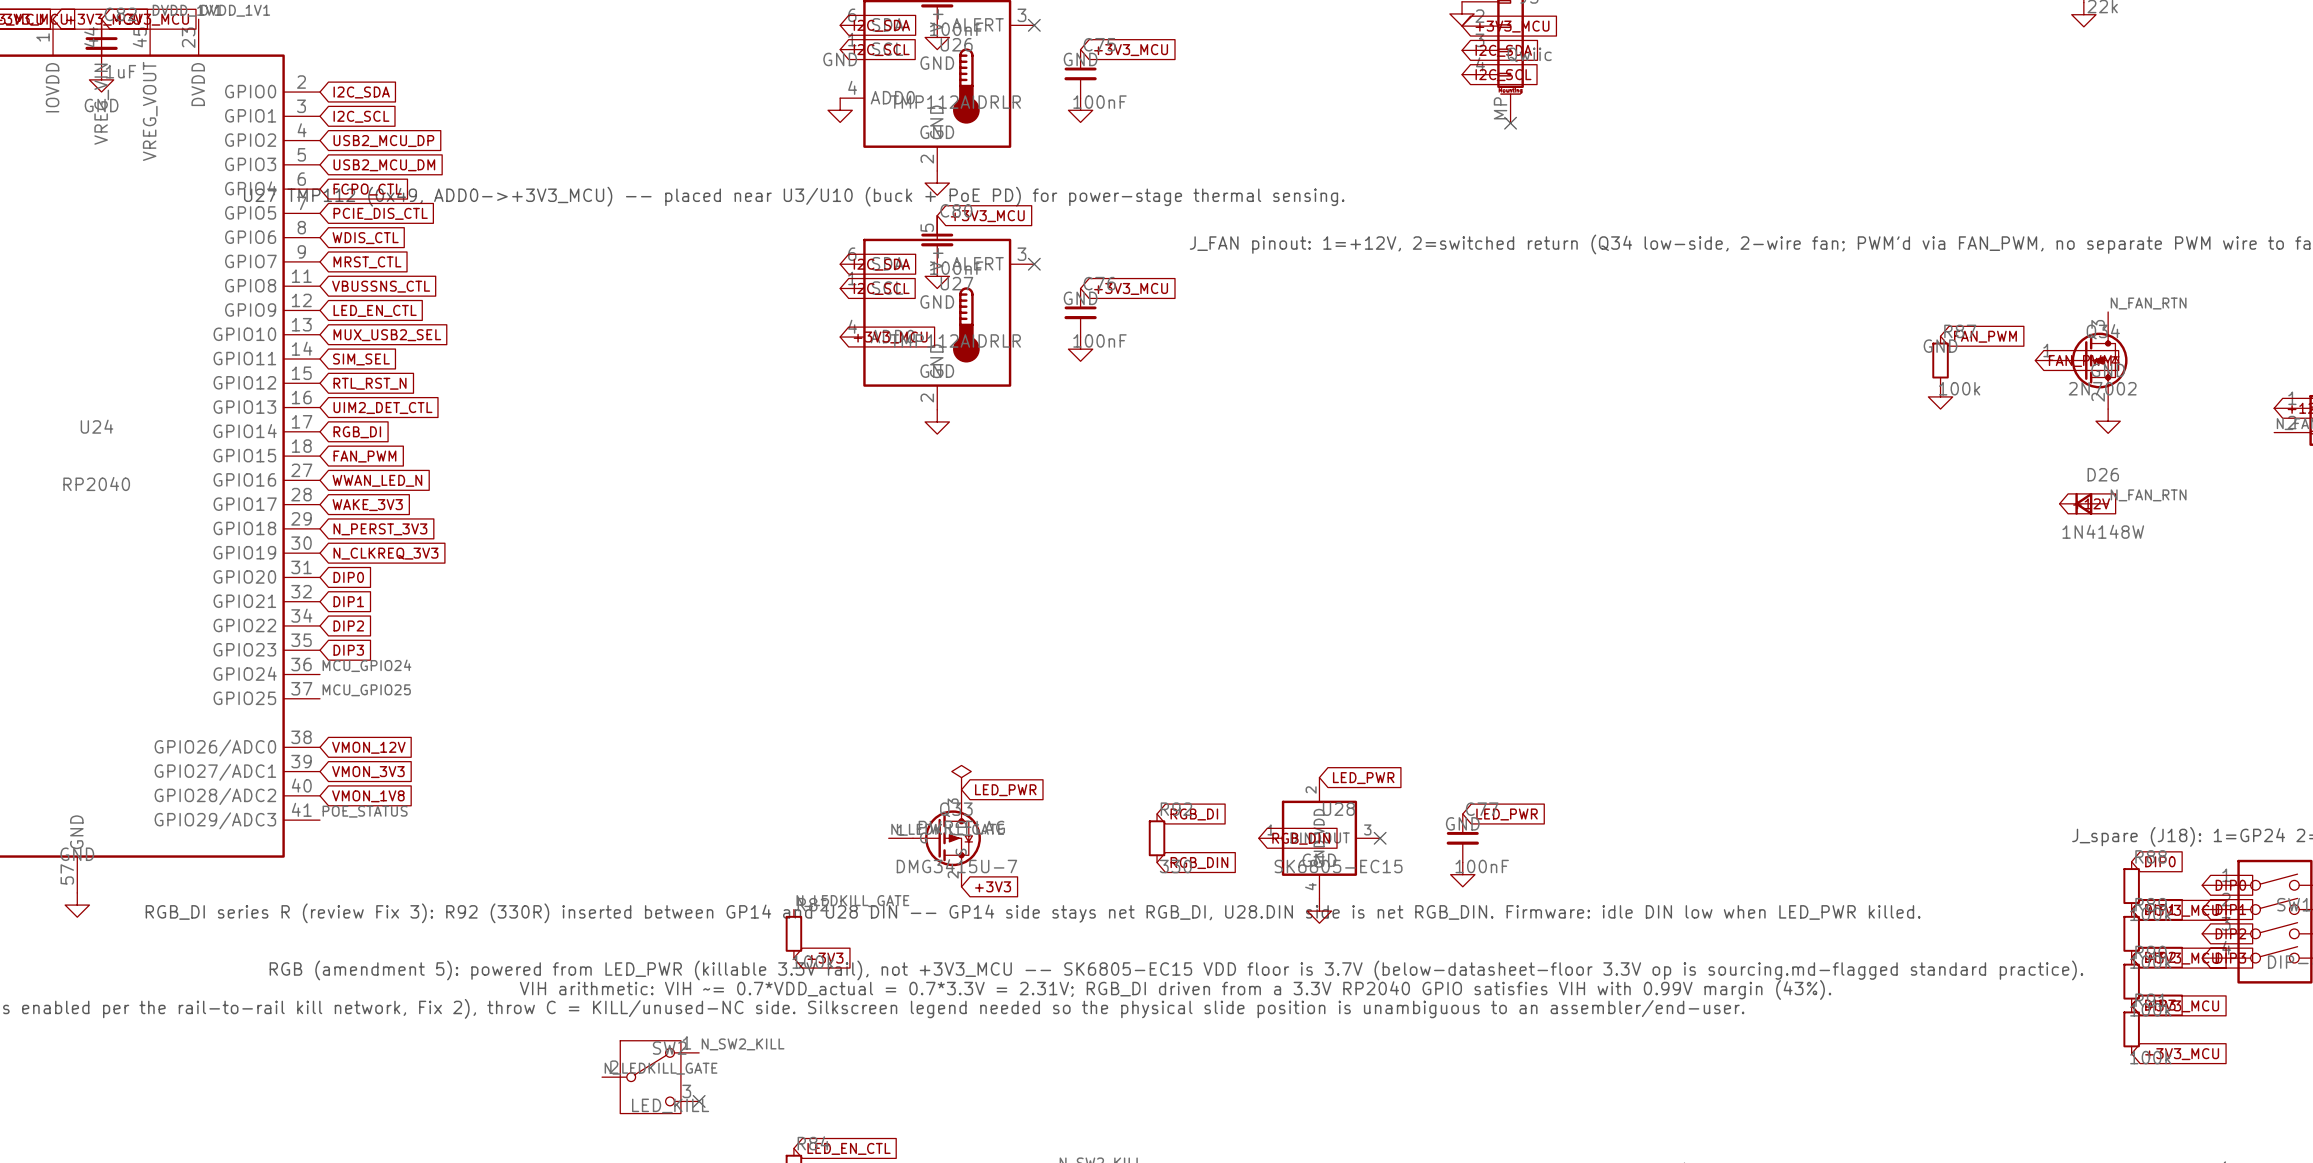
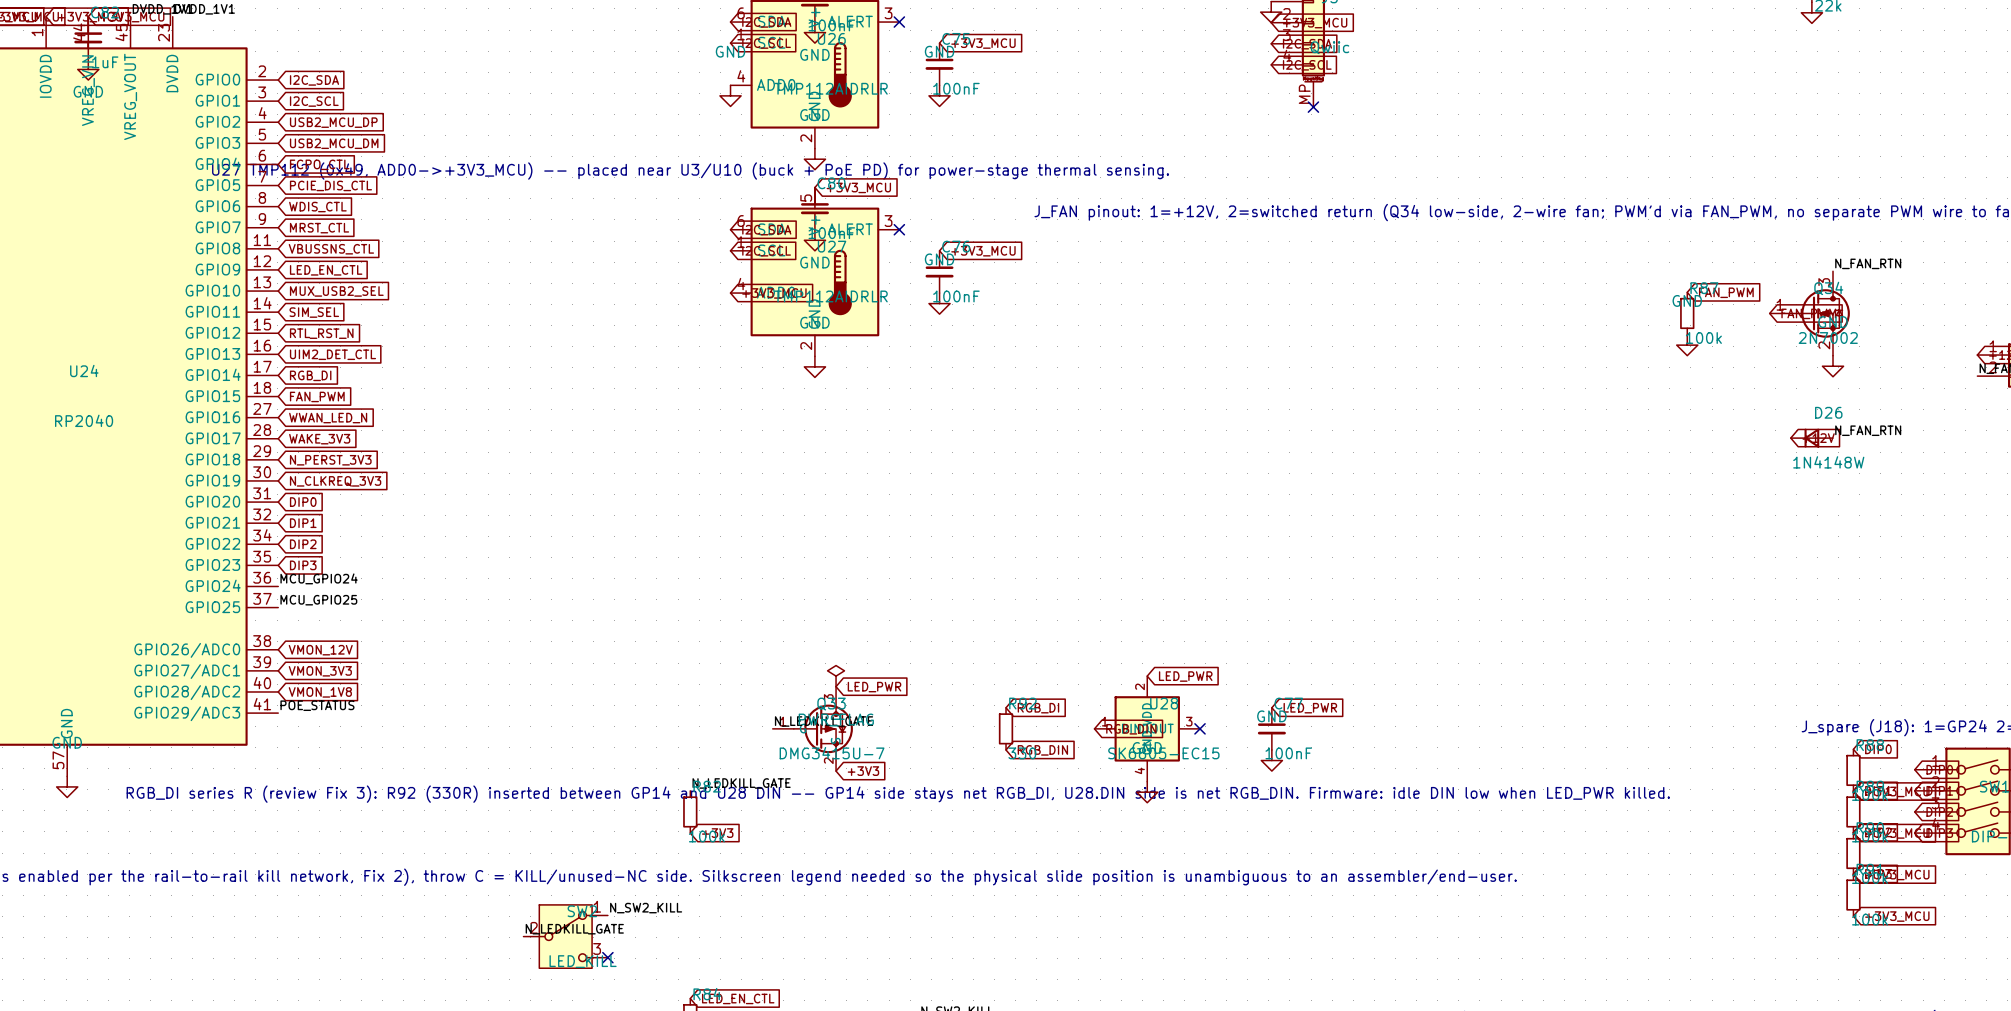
text: RGB (amendment 5): powered from LED_PWR (killable 3.3V rail), not +3V3_MCU -- SK6805-EC15 VDD floor is 3.7V (below-datasheet-floor 3.3V op is sourcing.md-flagged standard practice). (1176, 970) -> none
text: VIH arithmetic: VIH ~= 0.7*VDD_actual = 0.7*3.3V = 2.31V; RGB_DI driven from a 3.3V RP2040 GPIO satisfies VIH with 0.99V margin (43%). (1175, 989) -> none

